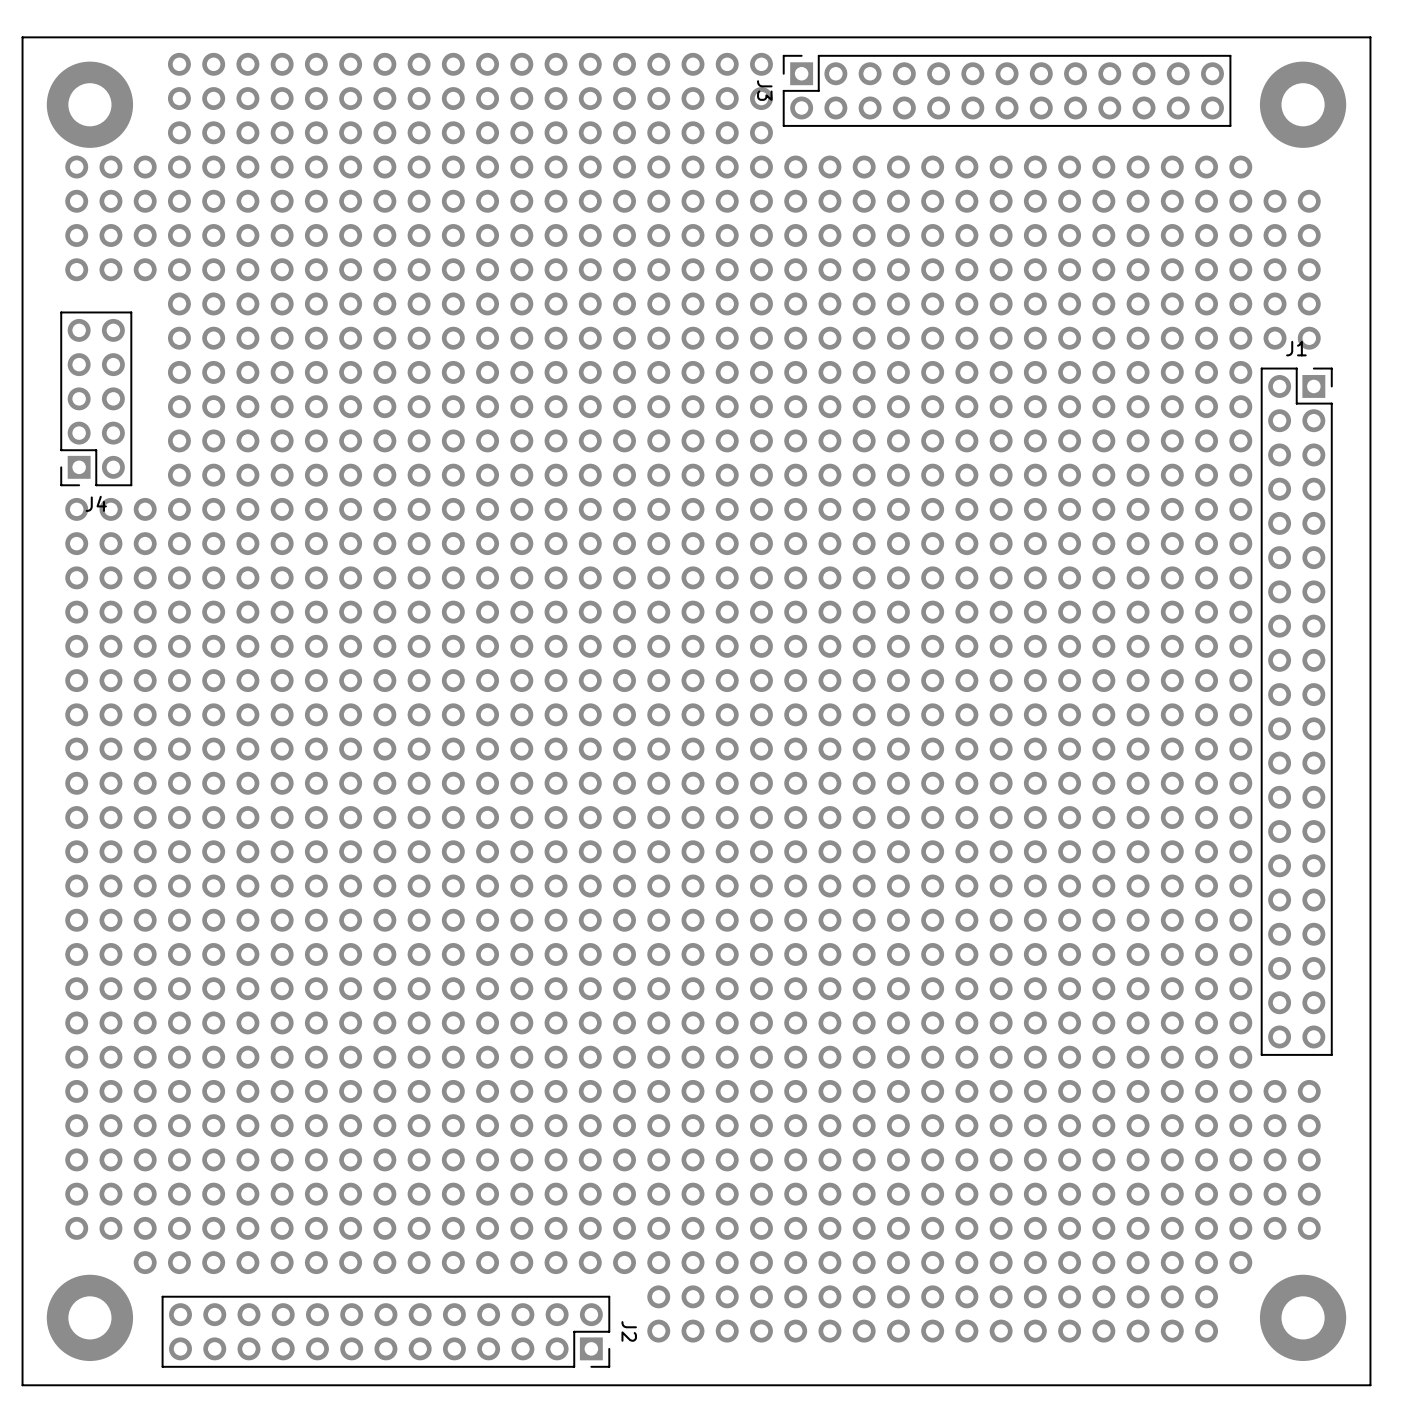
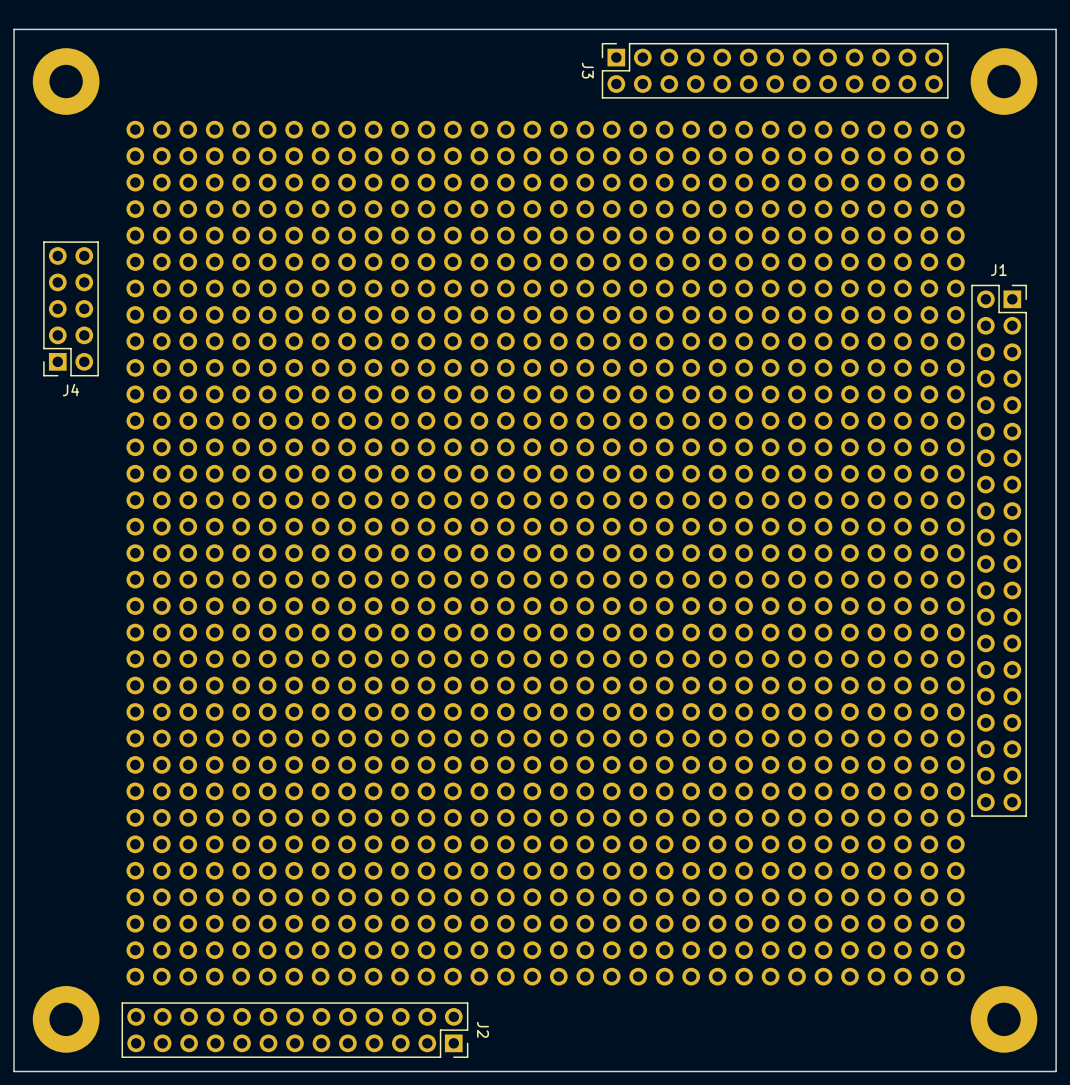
part: (692, 697) -> none

